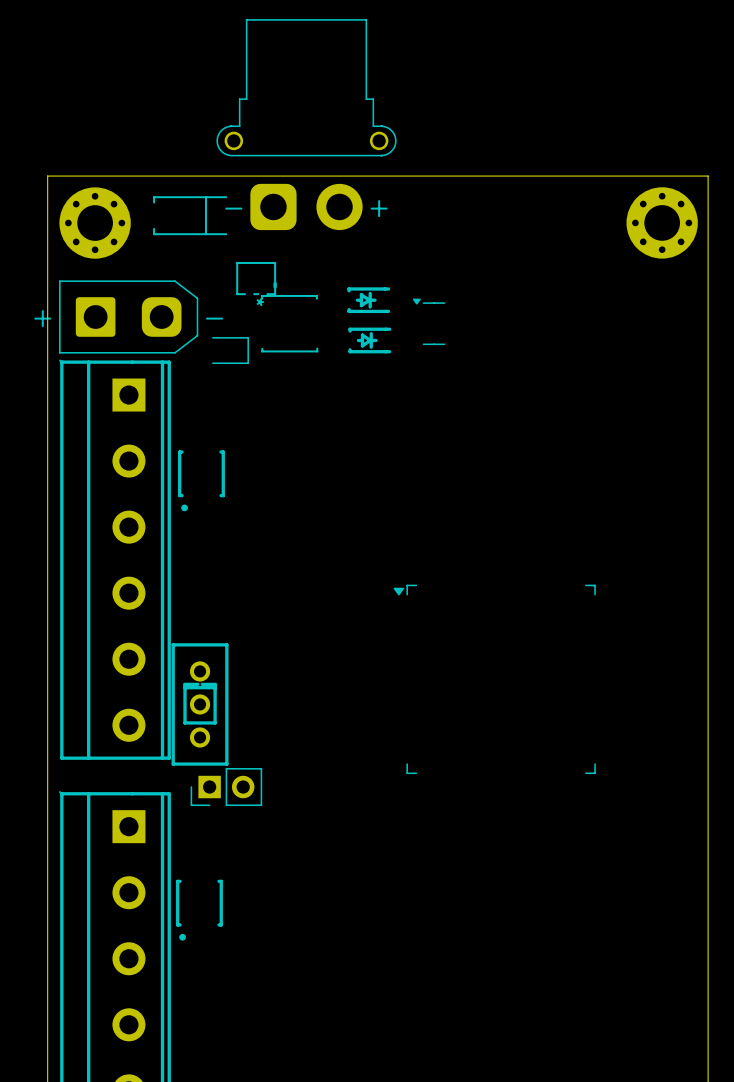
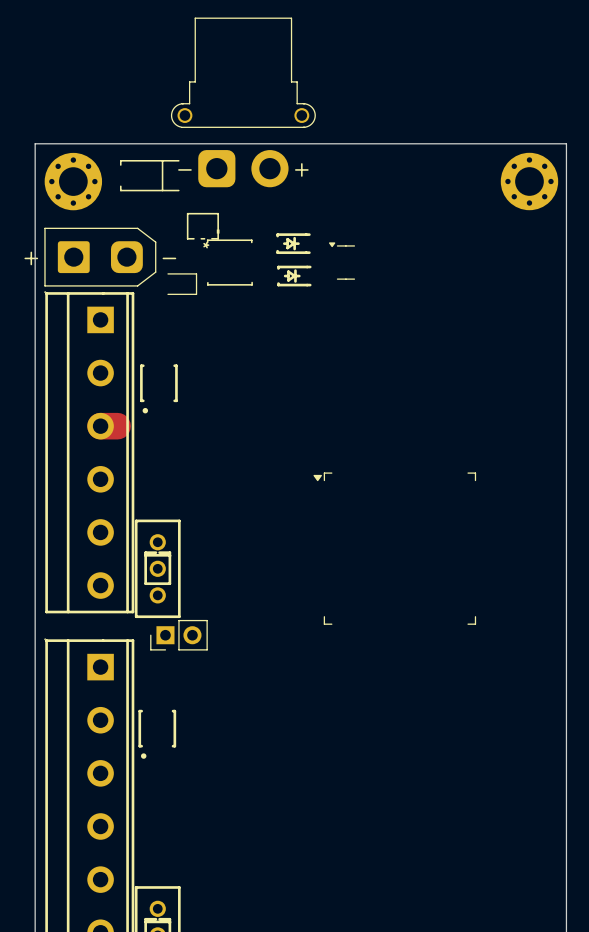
track: none -> (100, 426) (117, 426)

